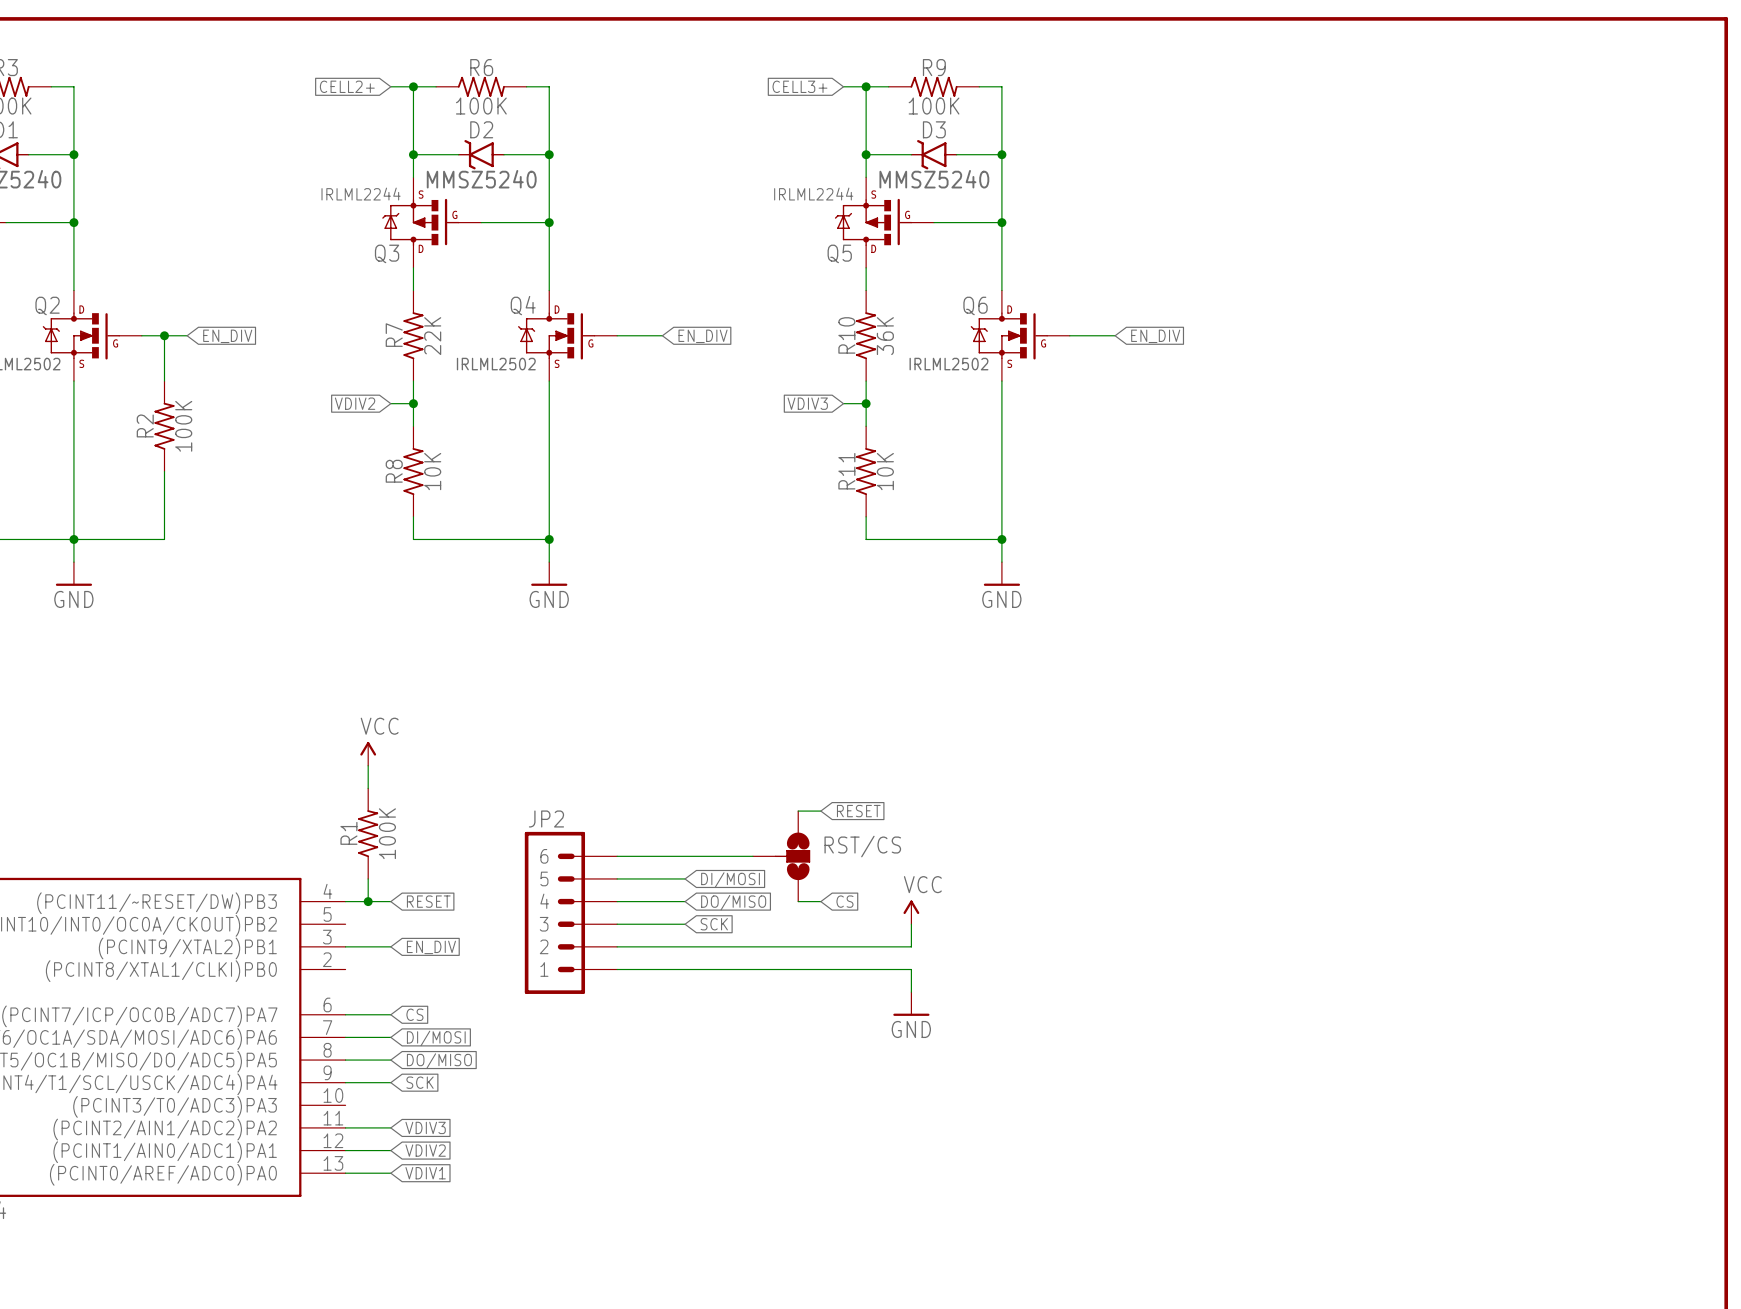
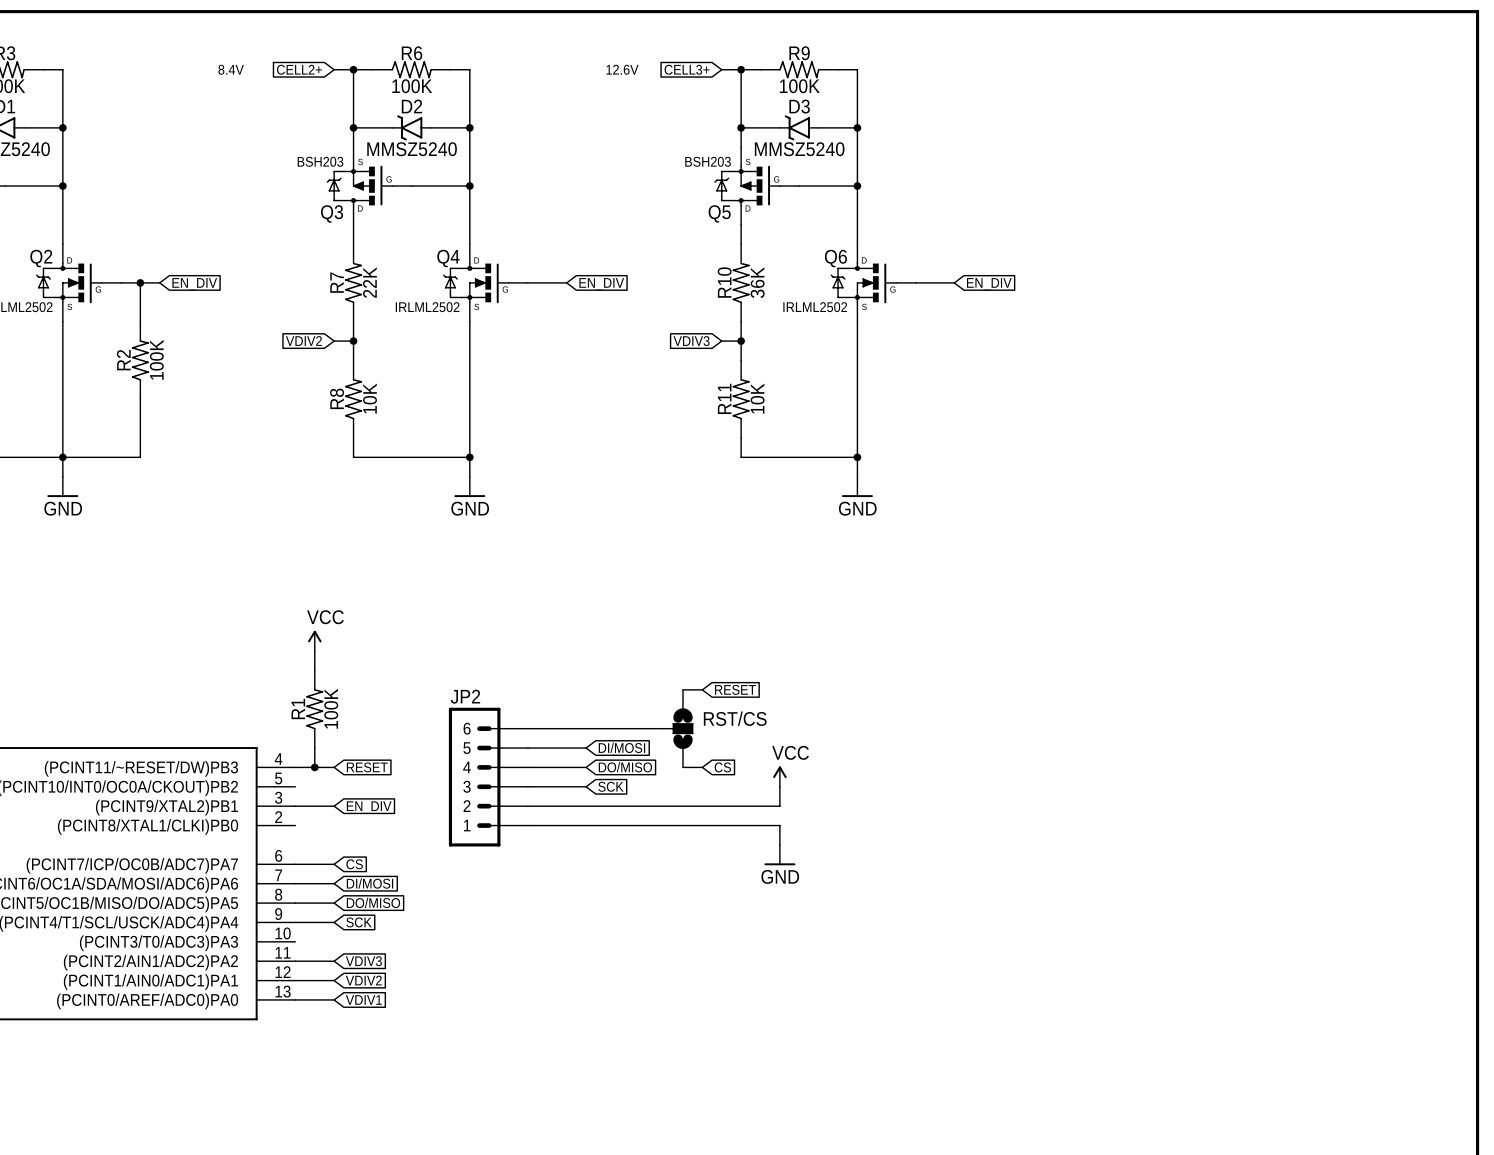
text: none -> 8.4V (231, 69)
text: none -> 12.6V (622, 69)
Q3 value: IRLML2244 (361, 194) -> BSH203 (320, 161)
Q5 value: IRLML2244 (813, 194) -> BSH203 (708, 161)

